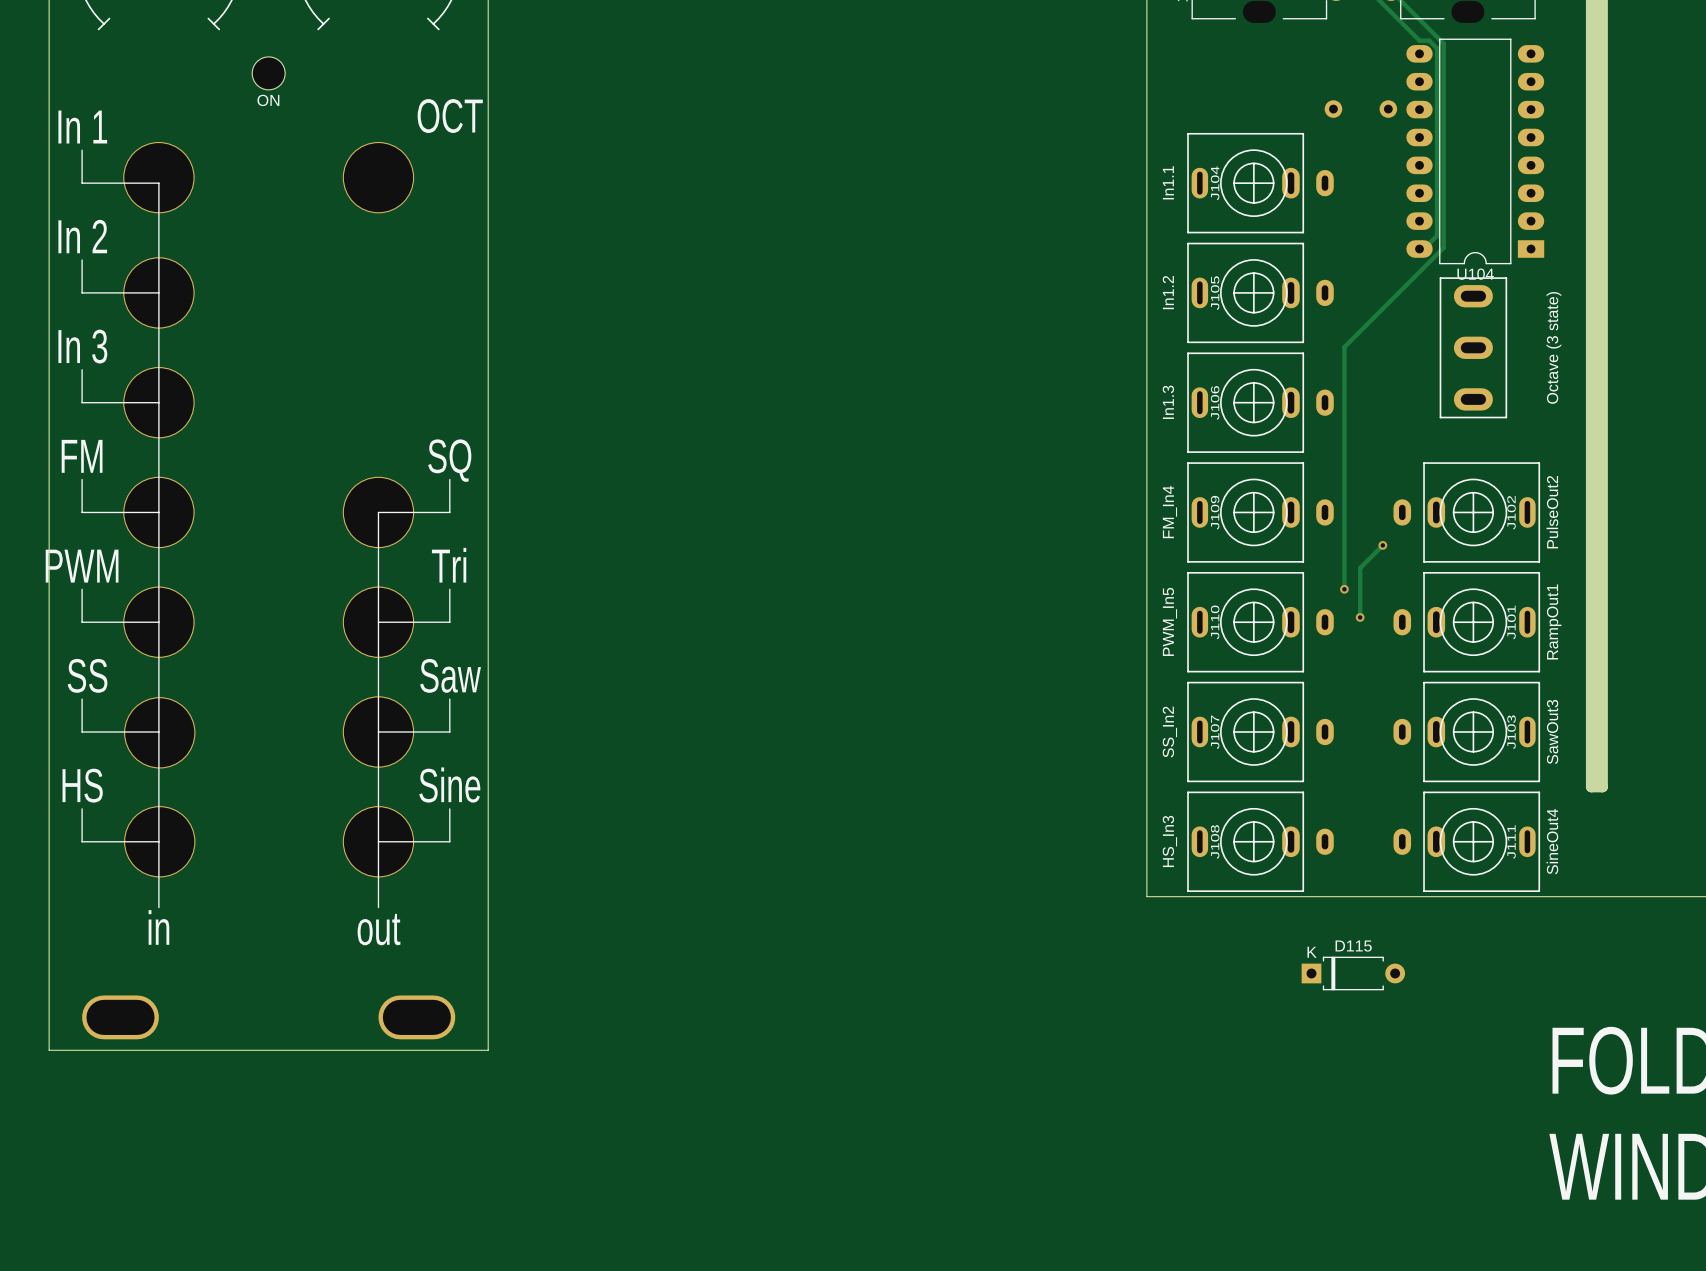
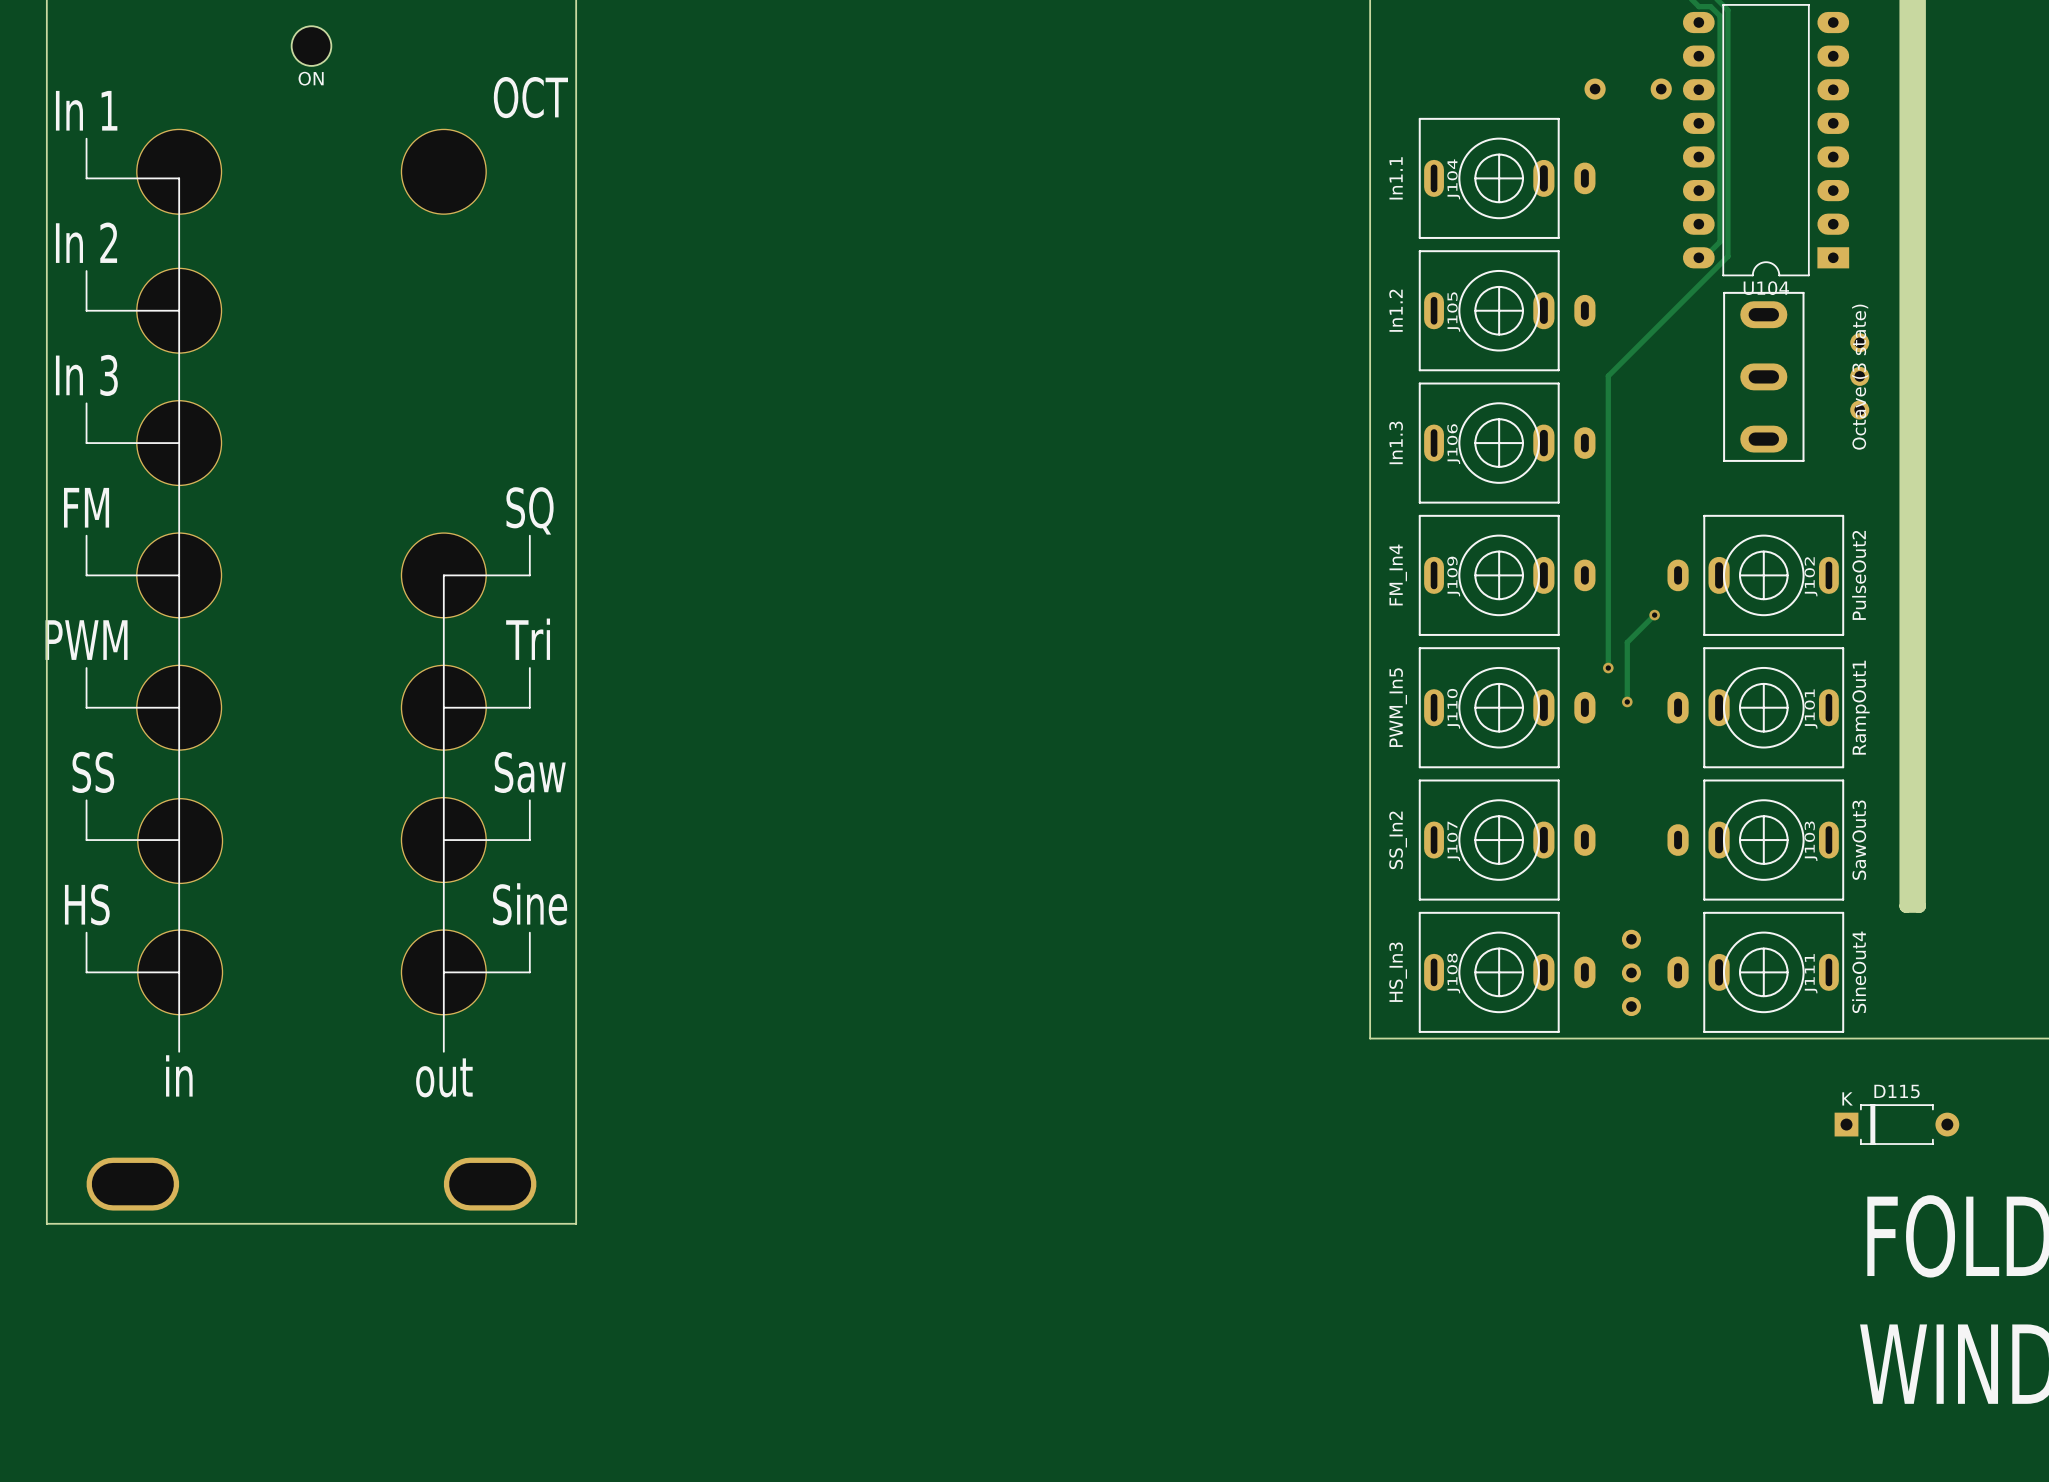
part: none -> (1859, 376)
part: none -> (1631, 972)
D115 position: (1353, 973) -> (1896, 1124)

